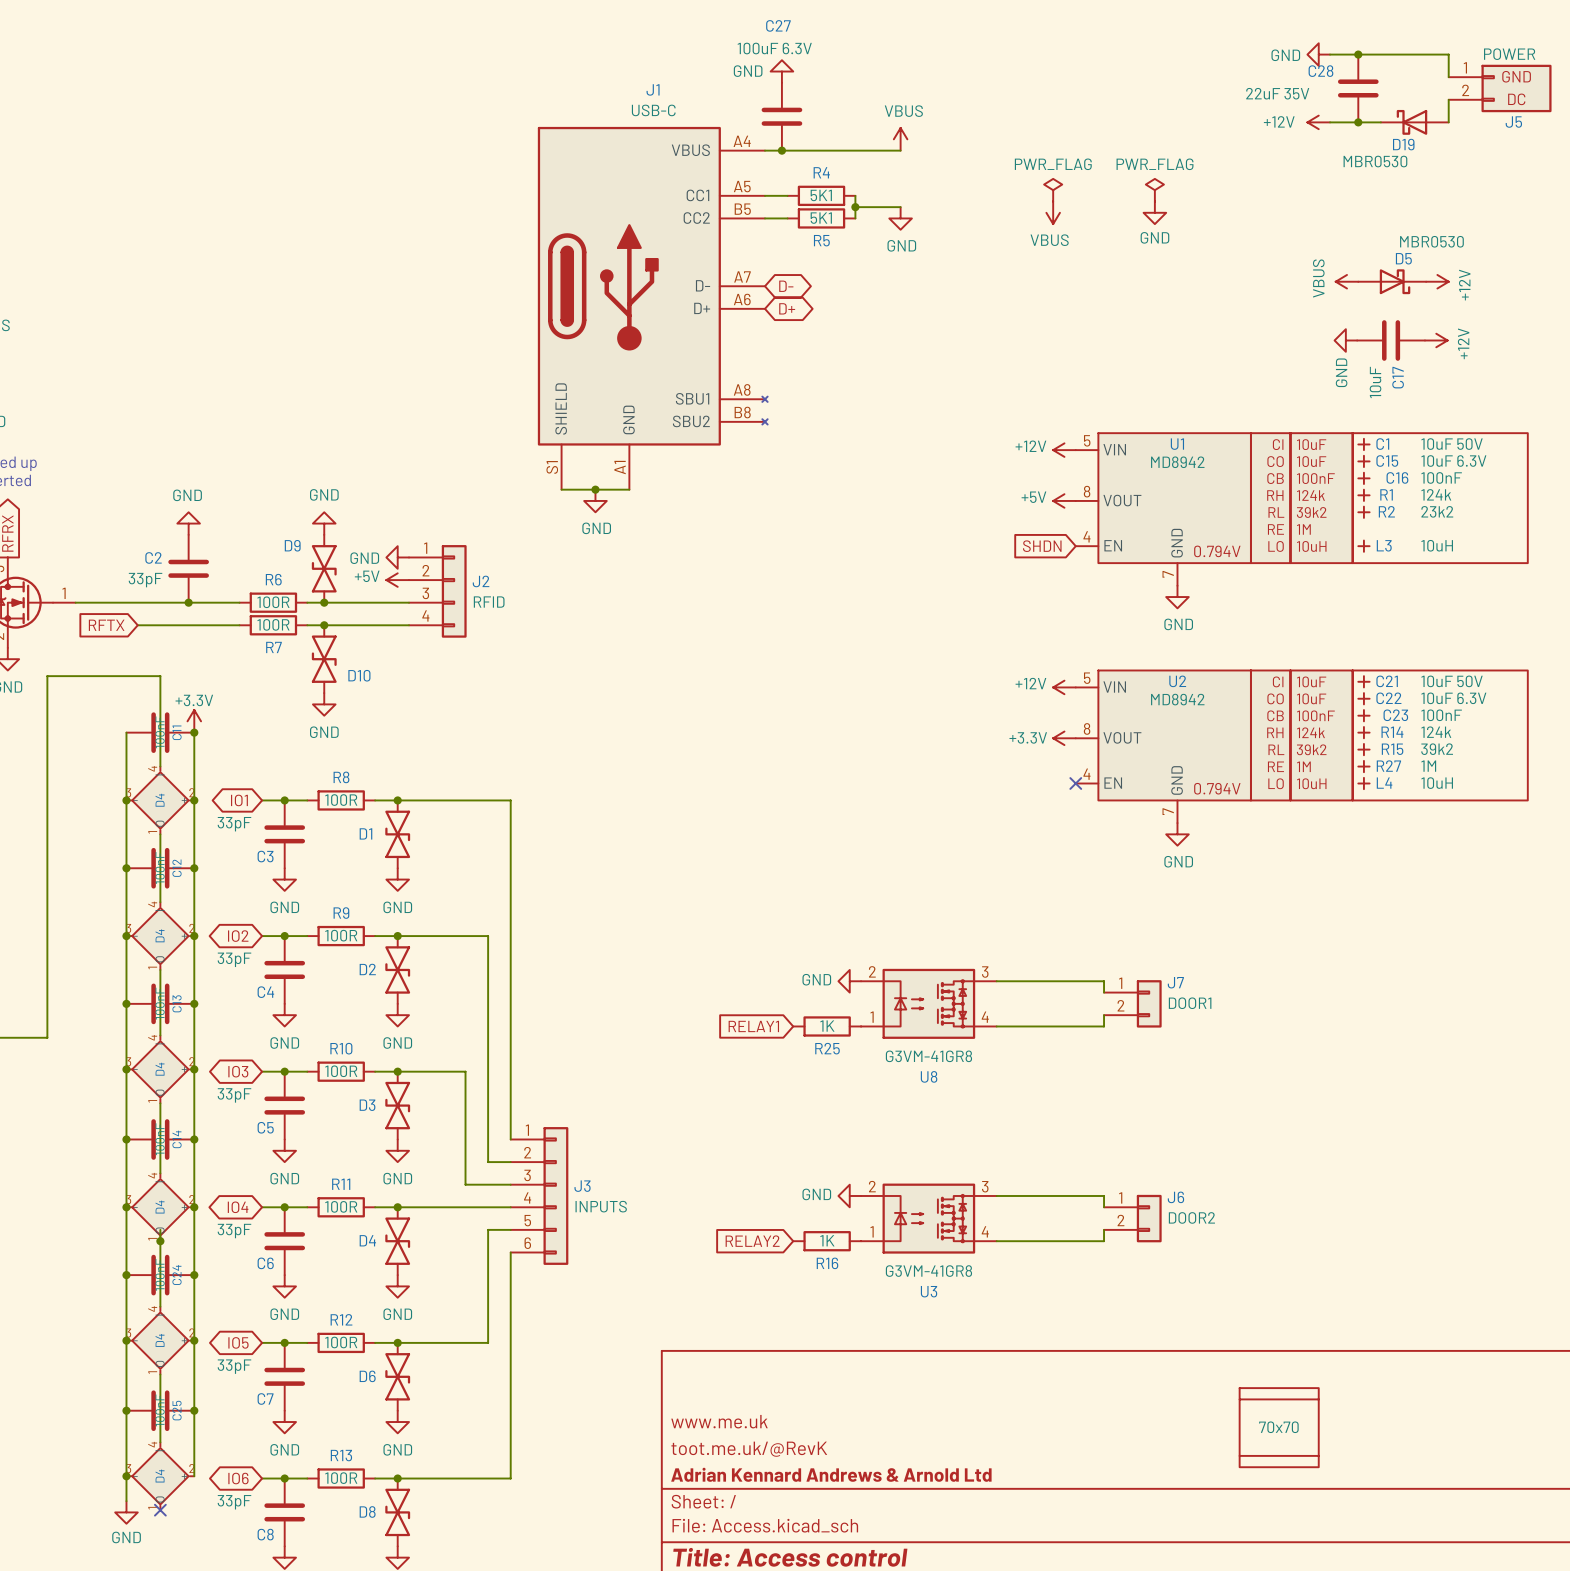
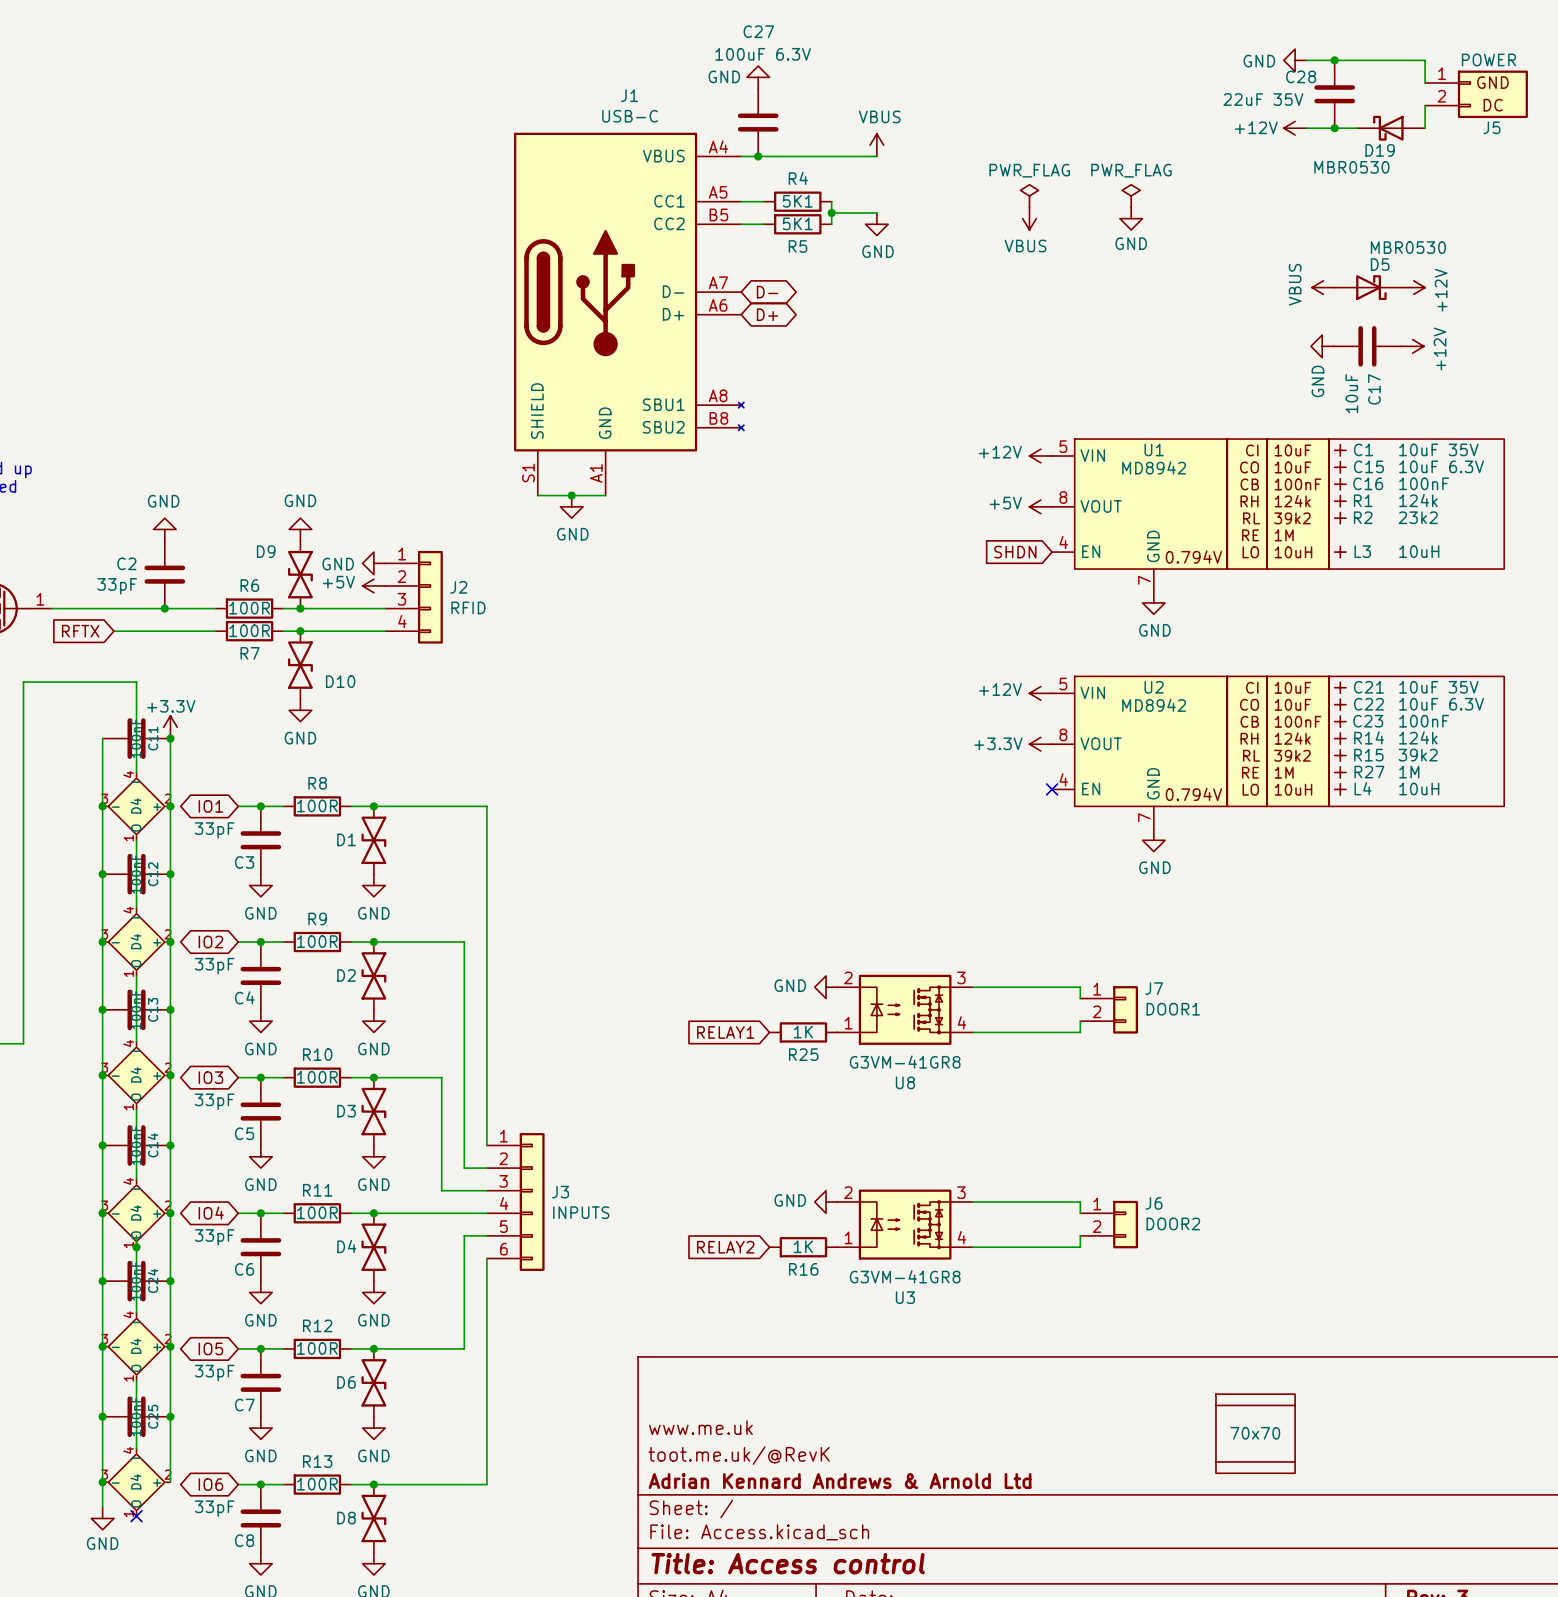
C1 value: 10uF 50V (1452, 444) -> 10uF 35V (1438, 449)
C21 value: 10uF 50V (1452, 681) -> 10uF 35V (1438, 687)

